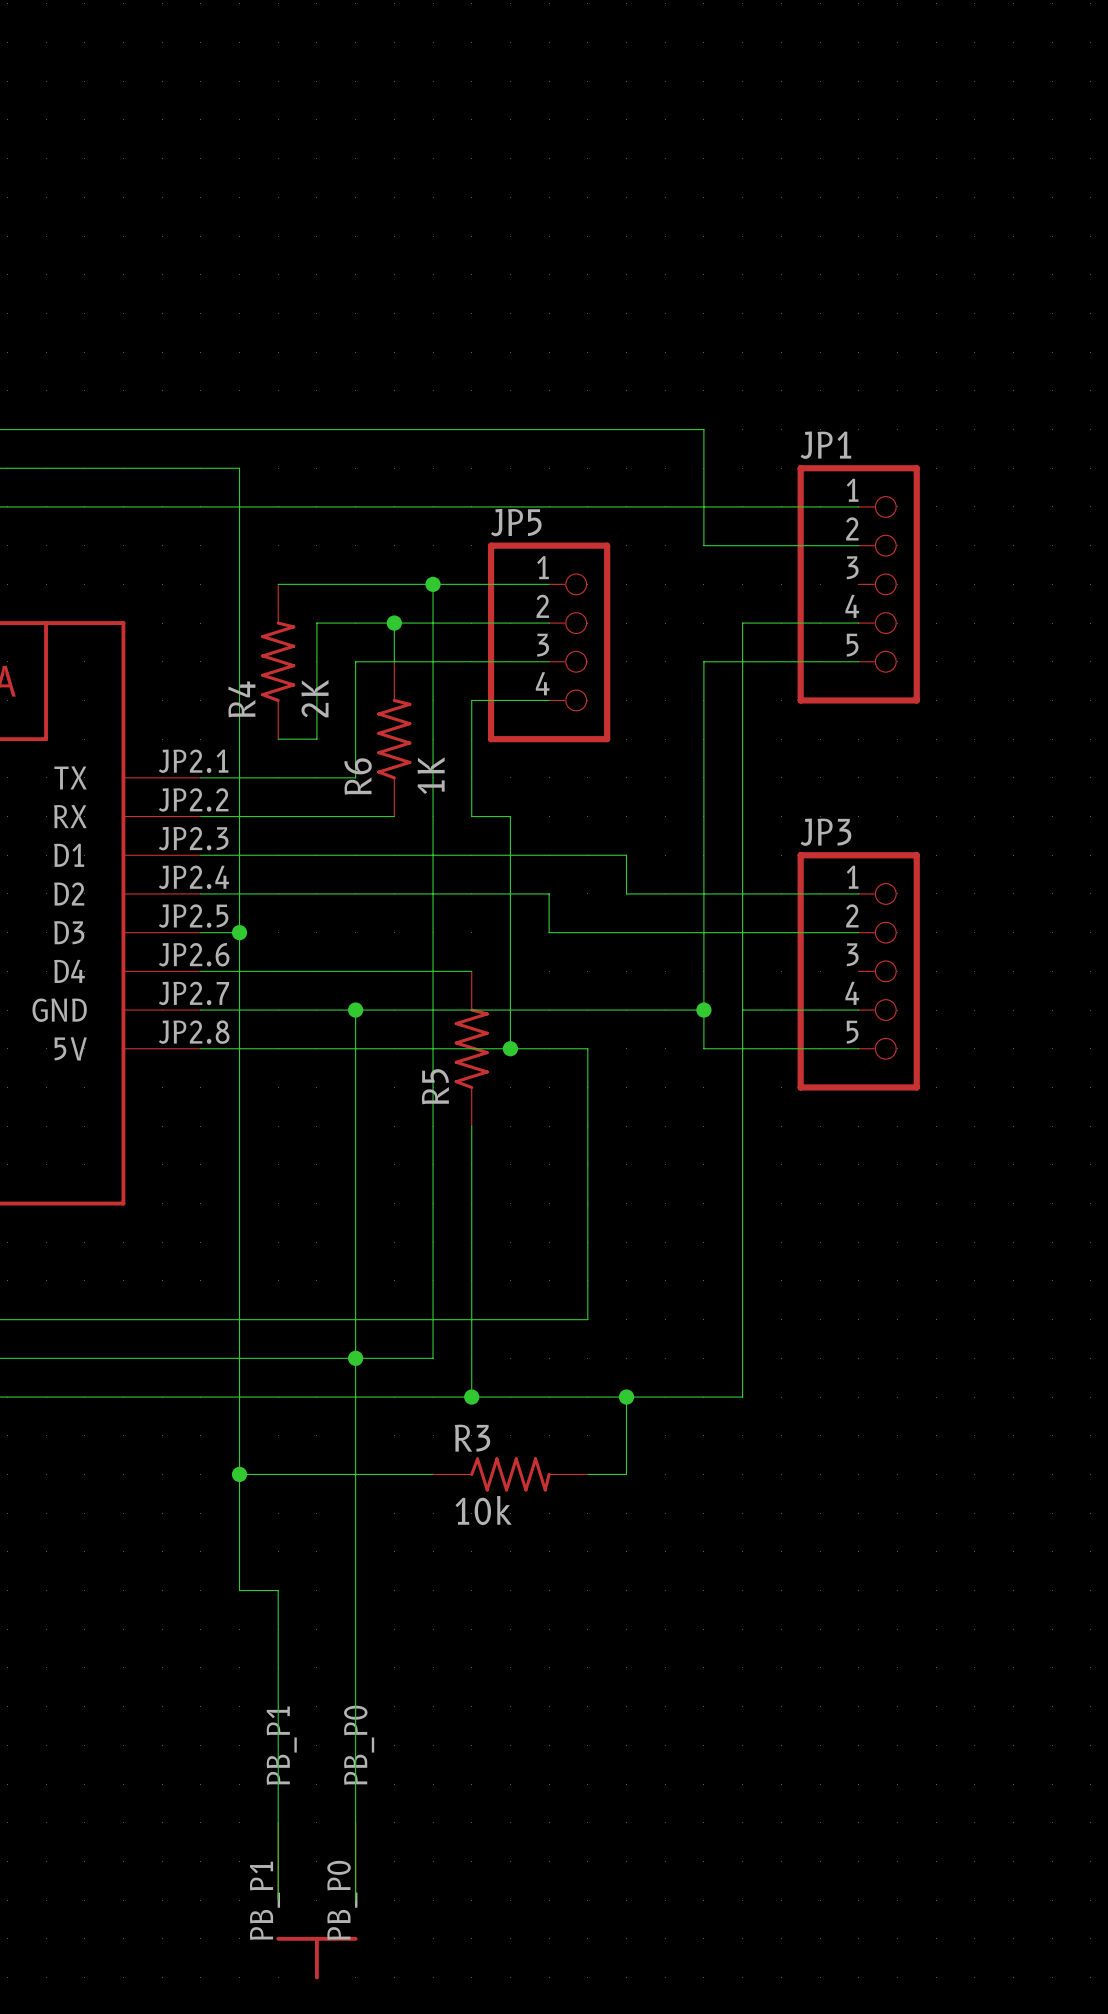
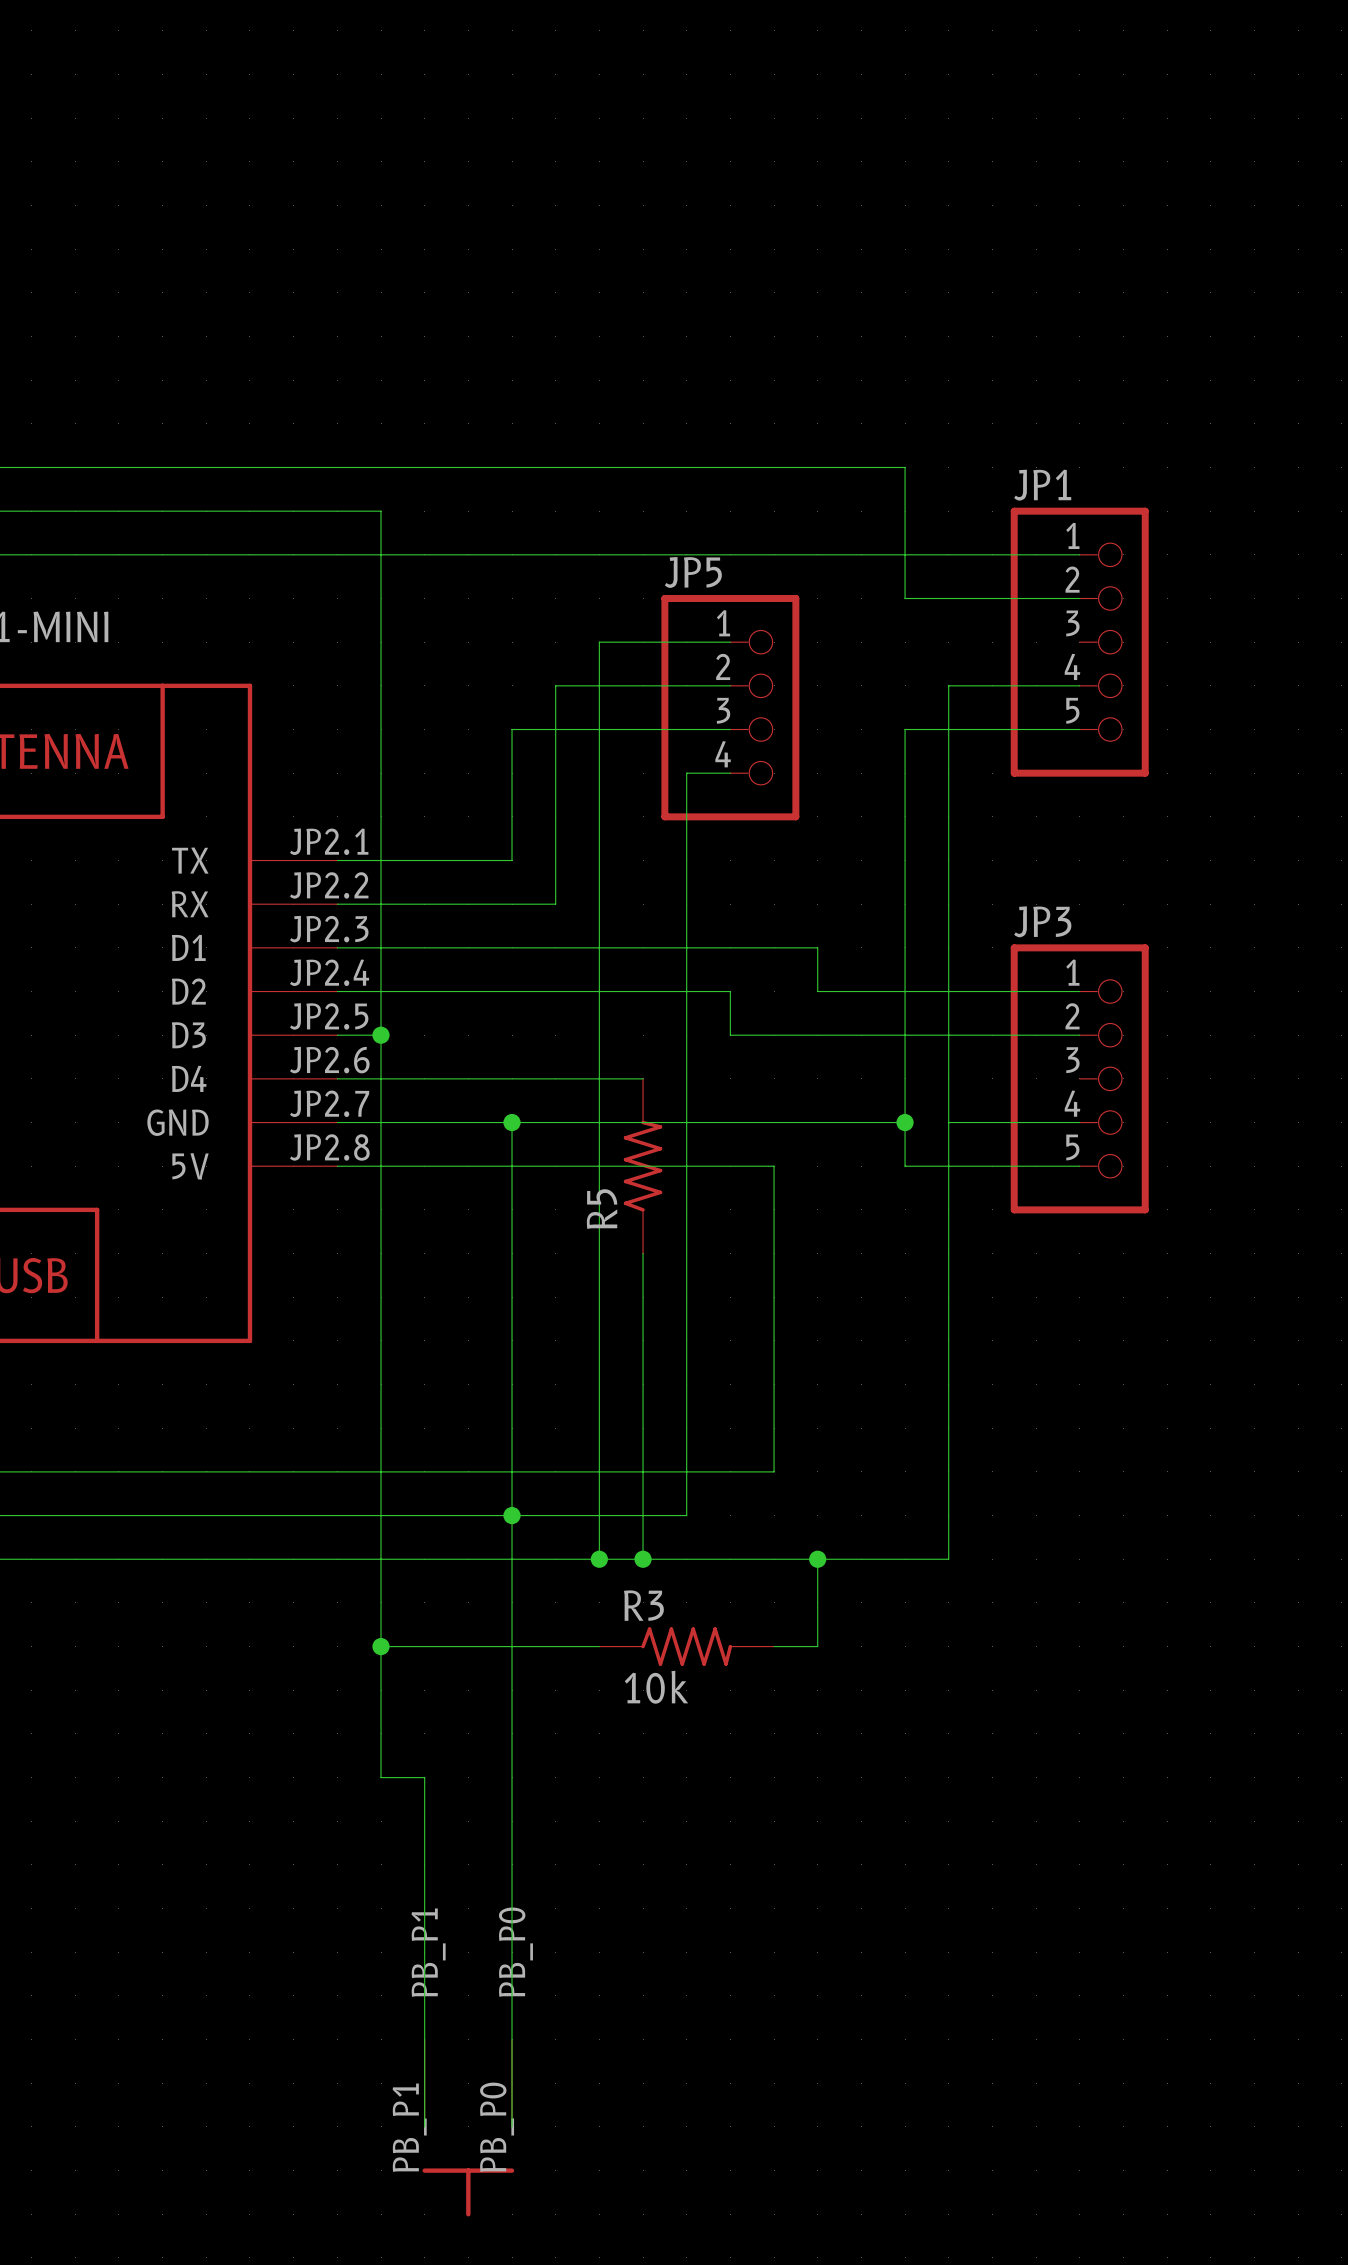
wire: (278, 584) (433, 584) -> none
junction: (433, 584) -> none
wire: (394, 623) (316, 623) (316, 739) (278, 739) -> none
junction: (394, 623) -> none
R4: 2K (278, 661) -> none
wire: (510, 700) (471, 700) (471, 816) (510, 816) -> (686, 773) (686, 904)
R6: 1K (394, 739) -> none
wire: none -> (686, 1166) (686, 1515) (599, 1515) (599, 1559)
junction: (510, 1048) -> none
junction: none -> (599, 1559)

